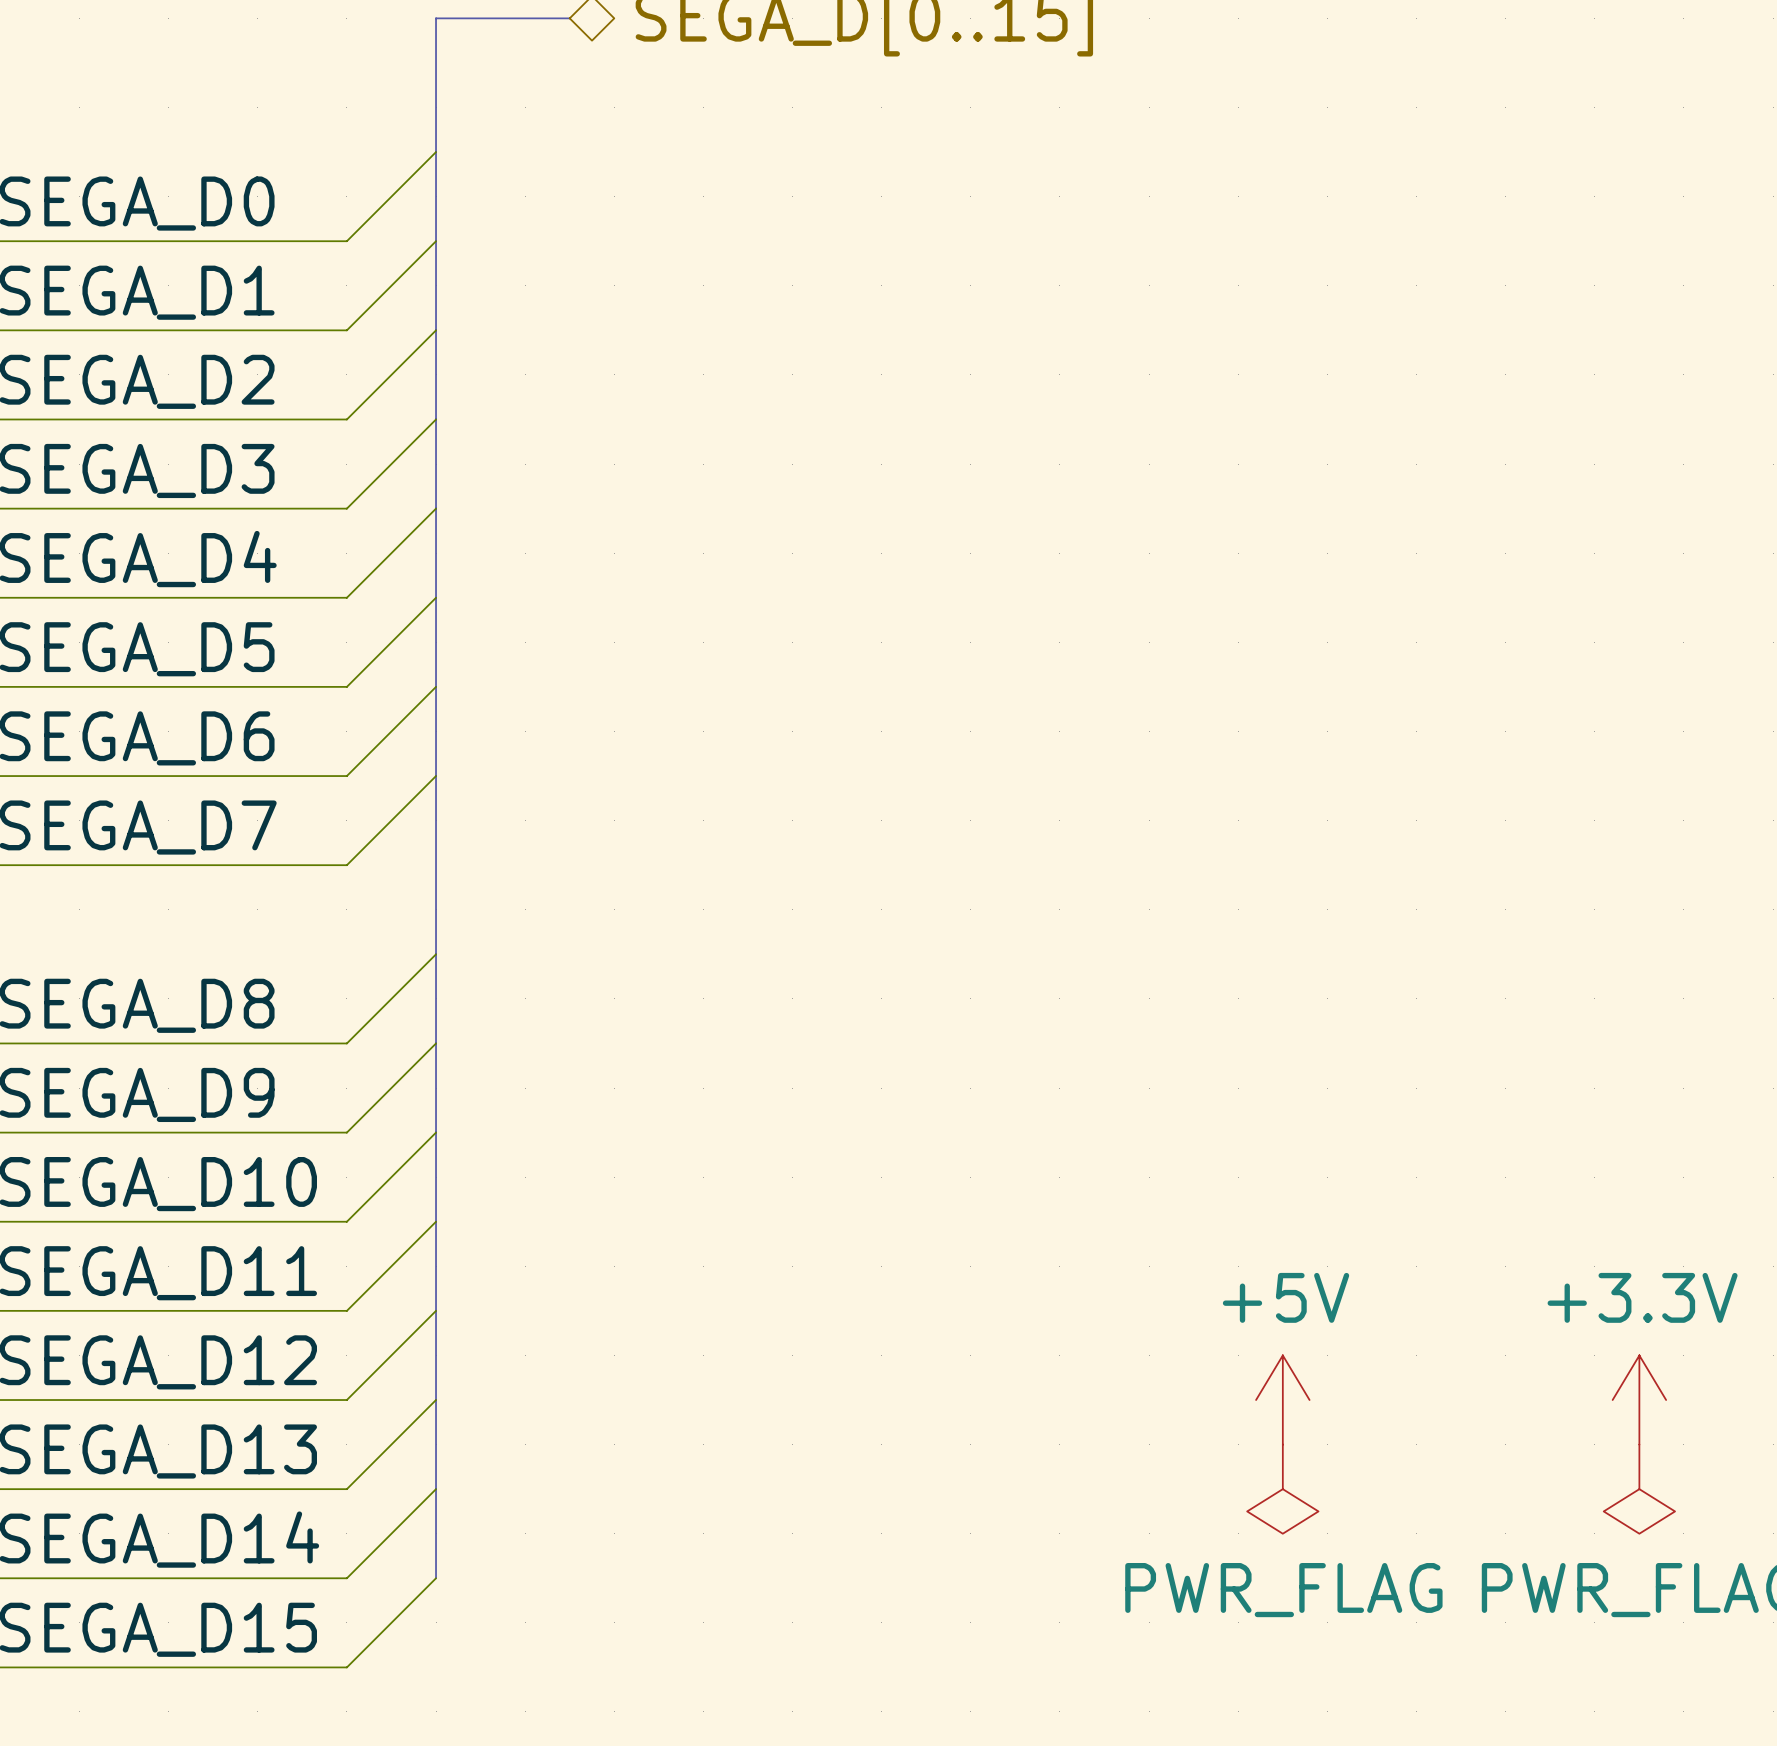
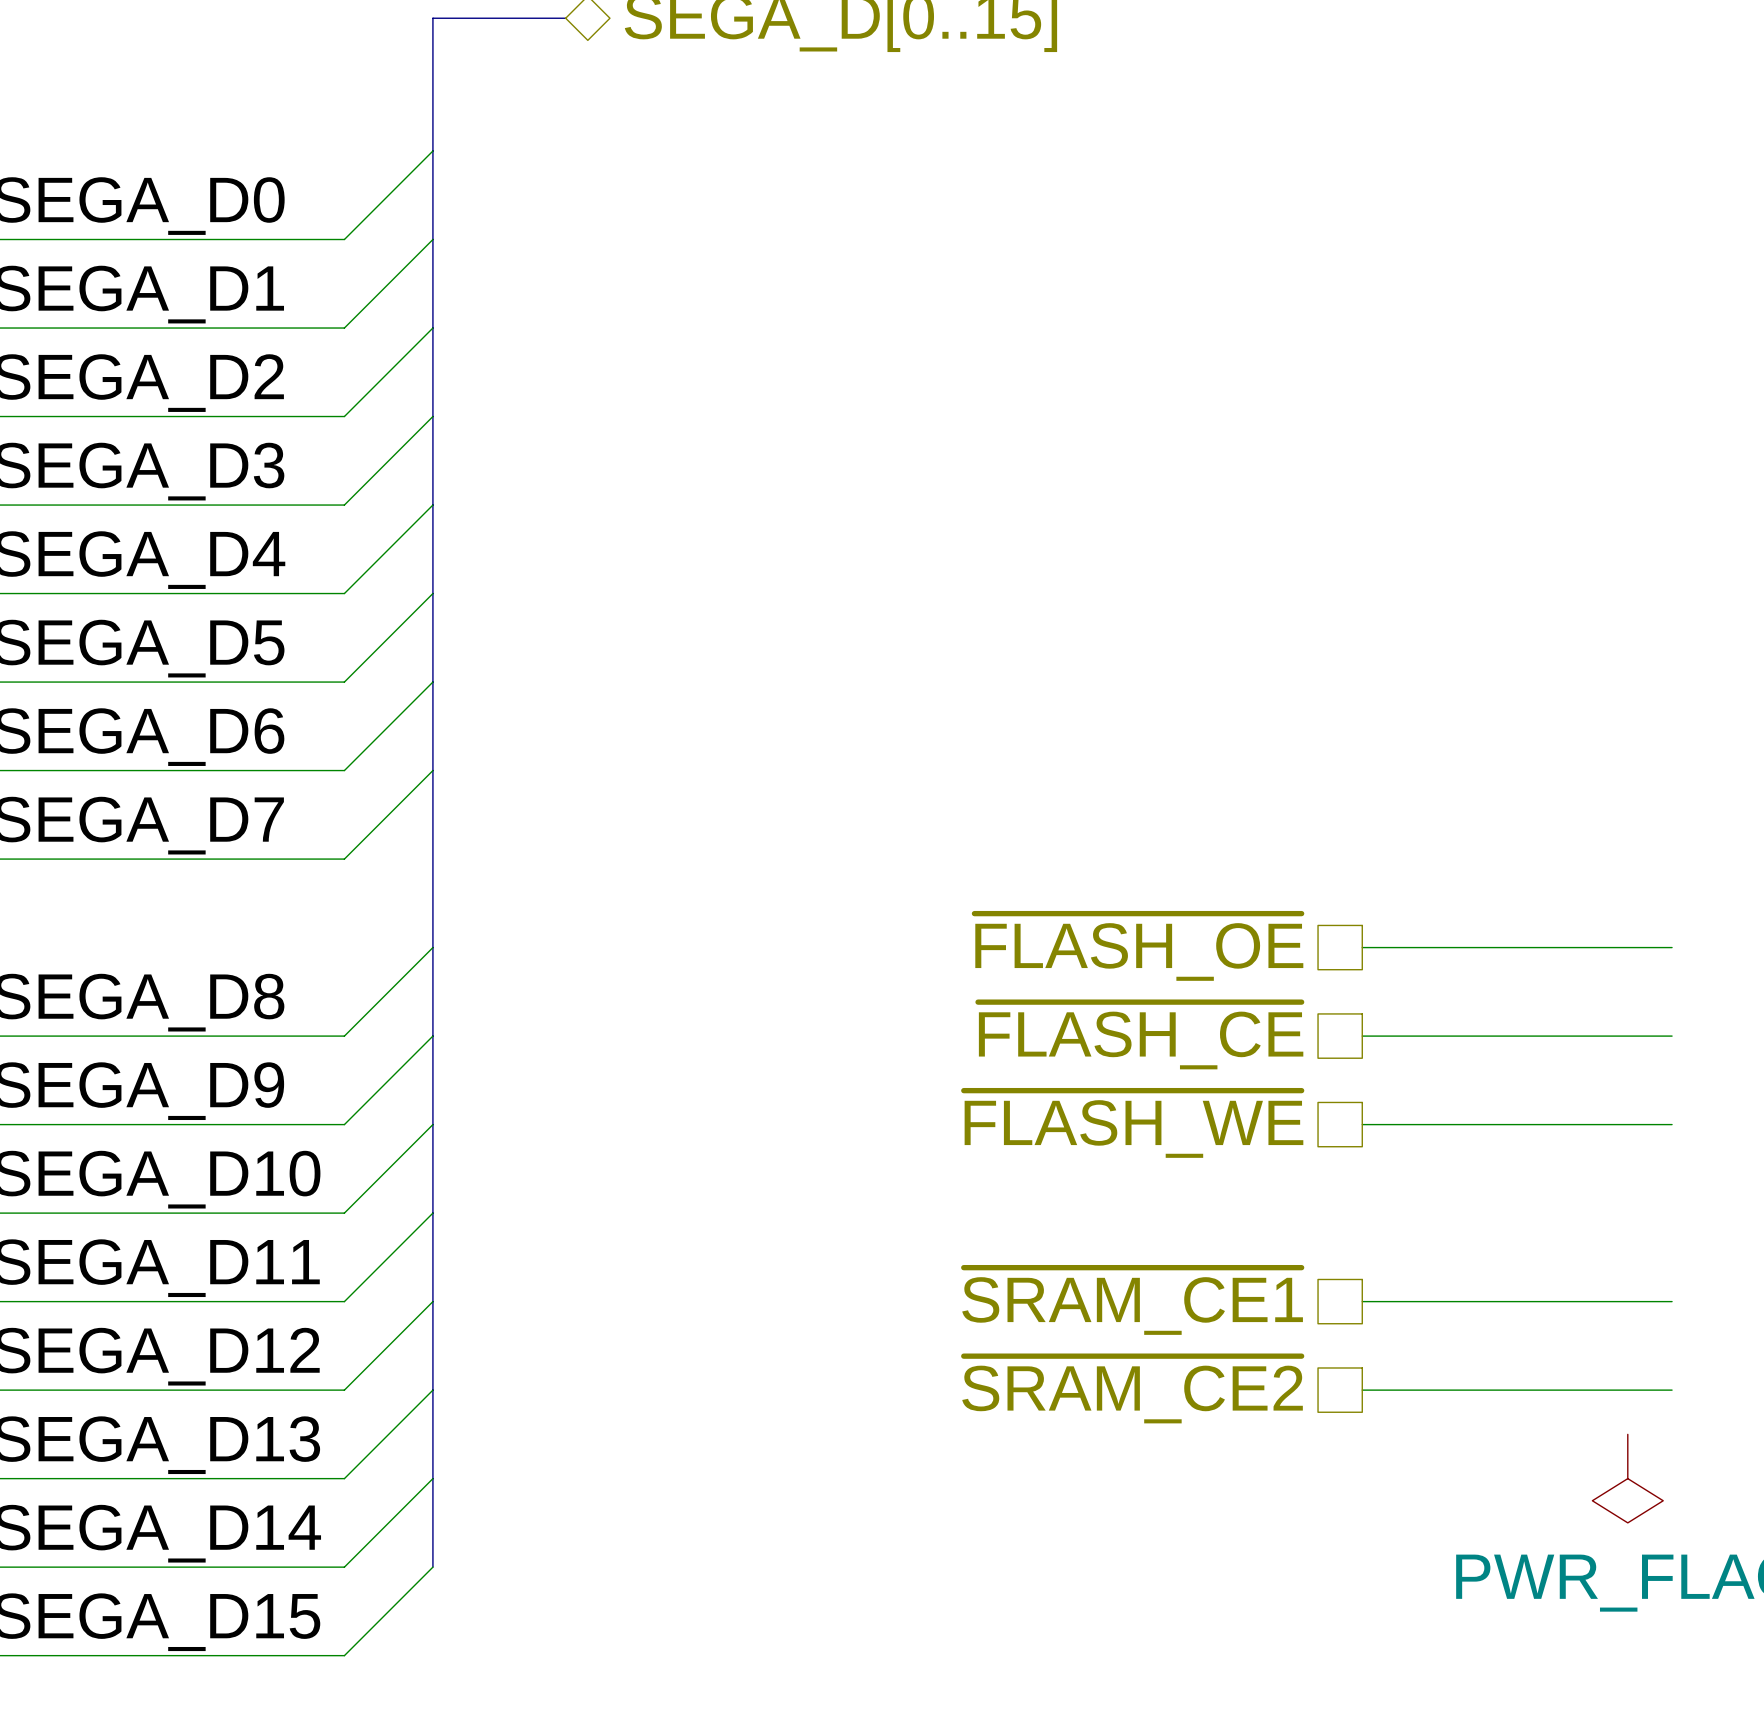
hierarchical label: none -> ~{FLASH_OE} (1138, 947)
wire: none -> (1362, 947) (1672, 947)
hierarchical label: none -> ~{FLASH_CE} (1140, 1035)
wire: none -> (1362, 1036) (1672, 1036)
hierarchical label: none -> ~{FLASH_WE} (1133, 1124)
wire: none -> (1362, 1124) (1672, 1124)
hierarchical label: none -> ~{SRAM_CE1} (1132, 1301)
wire: none -> (1362, 1301) (1672, 1301)
hierarchical label: none -> ~{SRAM_CE2} (1132, 1389)
power symbol: +5V (1282, 1400) -> none
wire: none -> (1362, 1390) (1672, 1390)
power symbol: +3.3V (1639, 1400) -> none
power symbol: PWR_FLAG (1282, 1489) -> none

